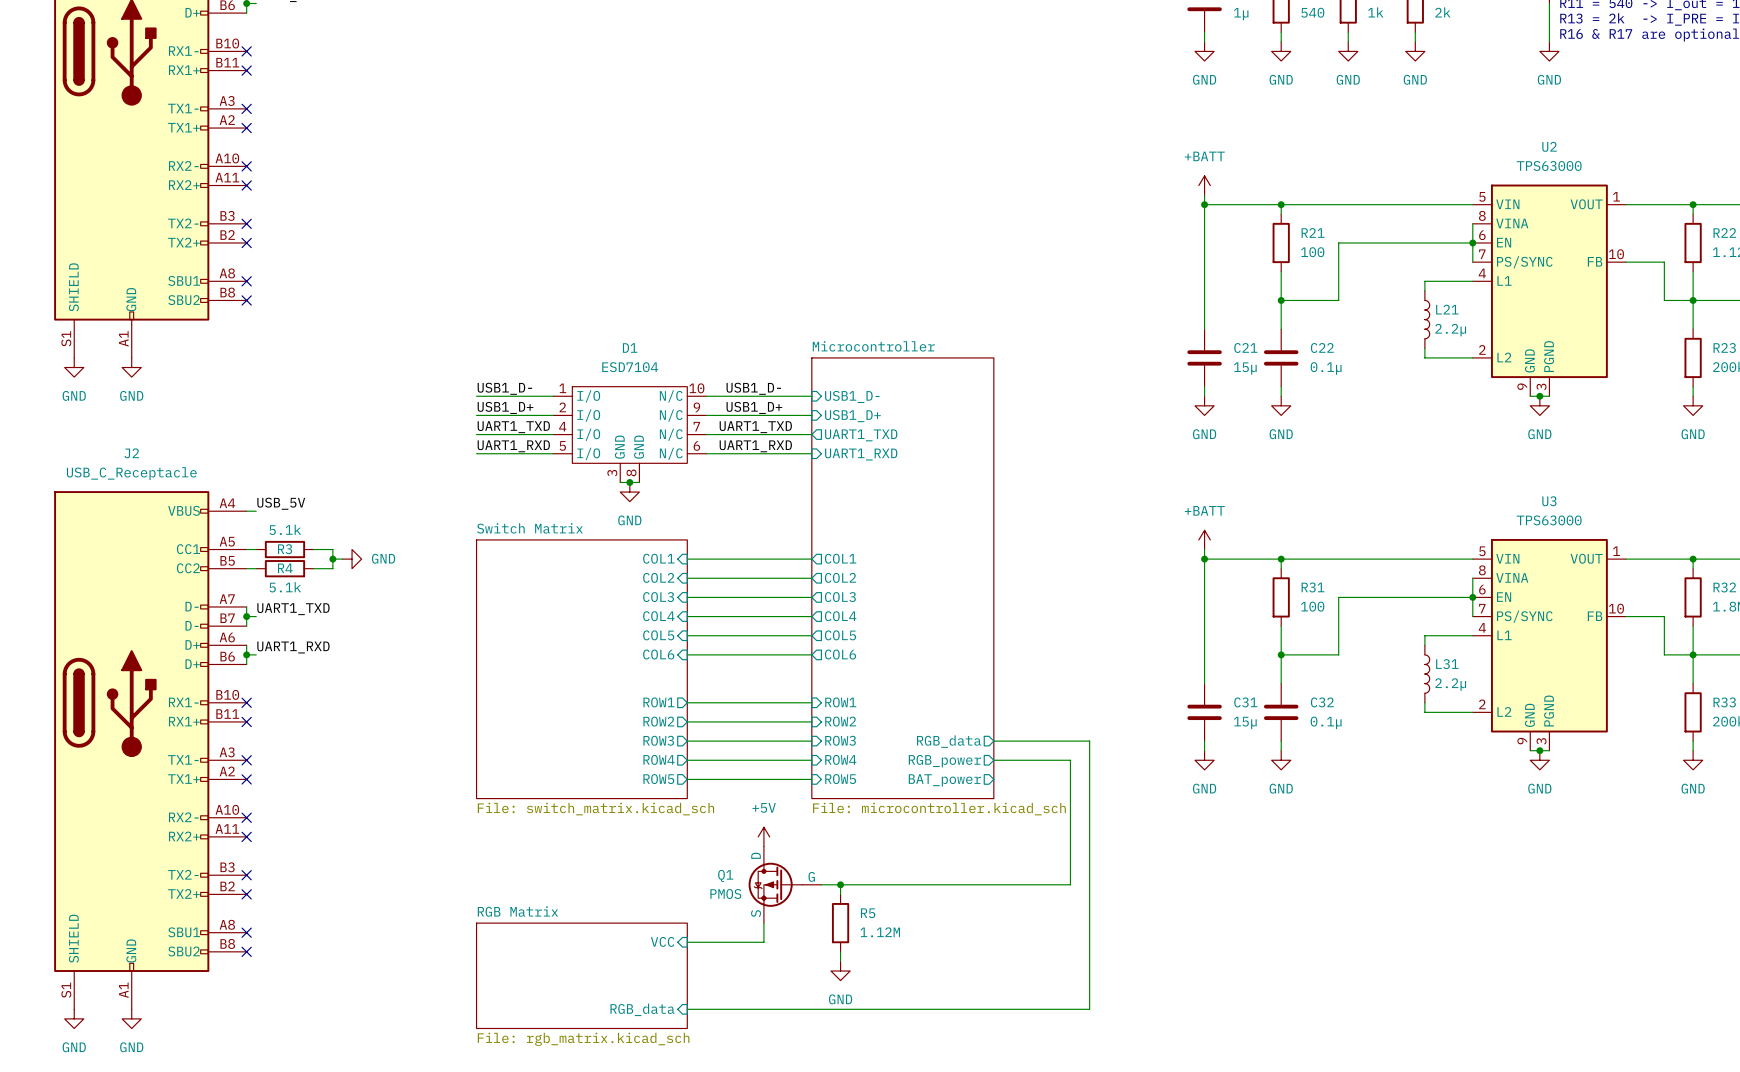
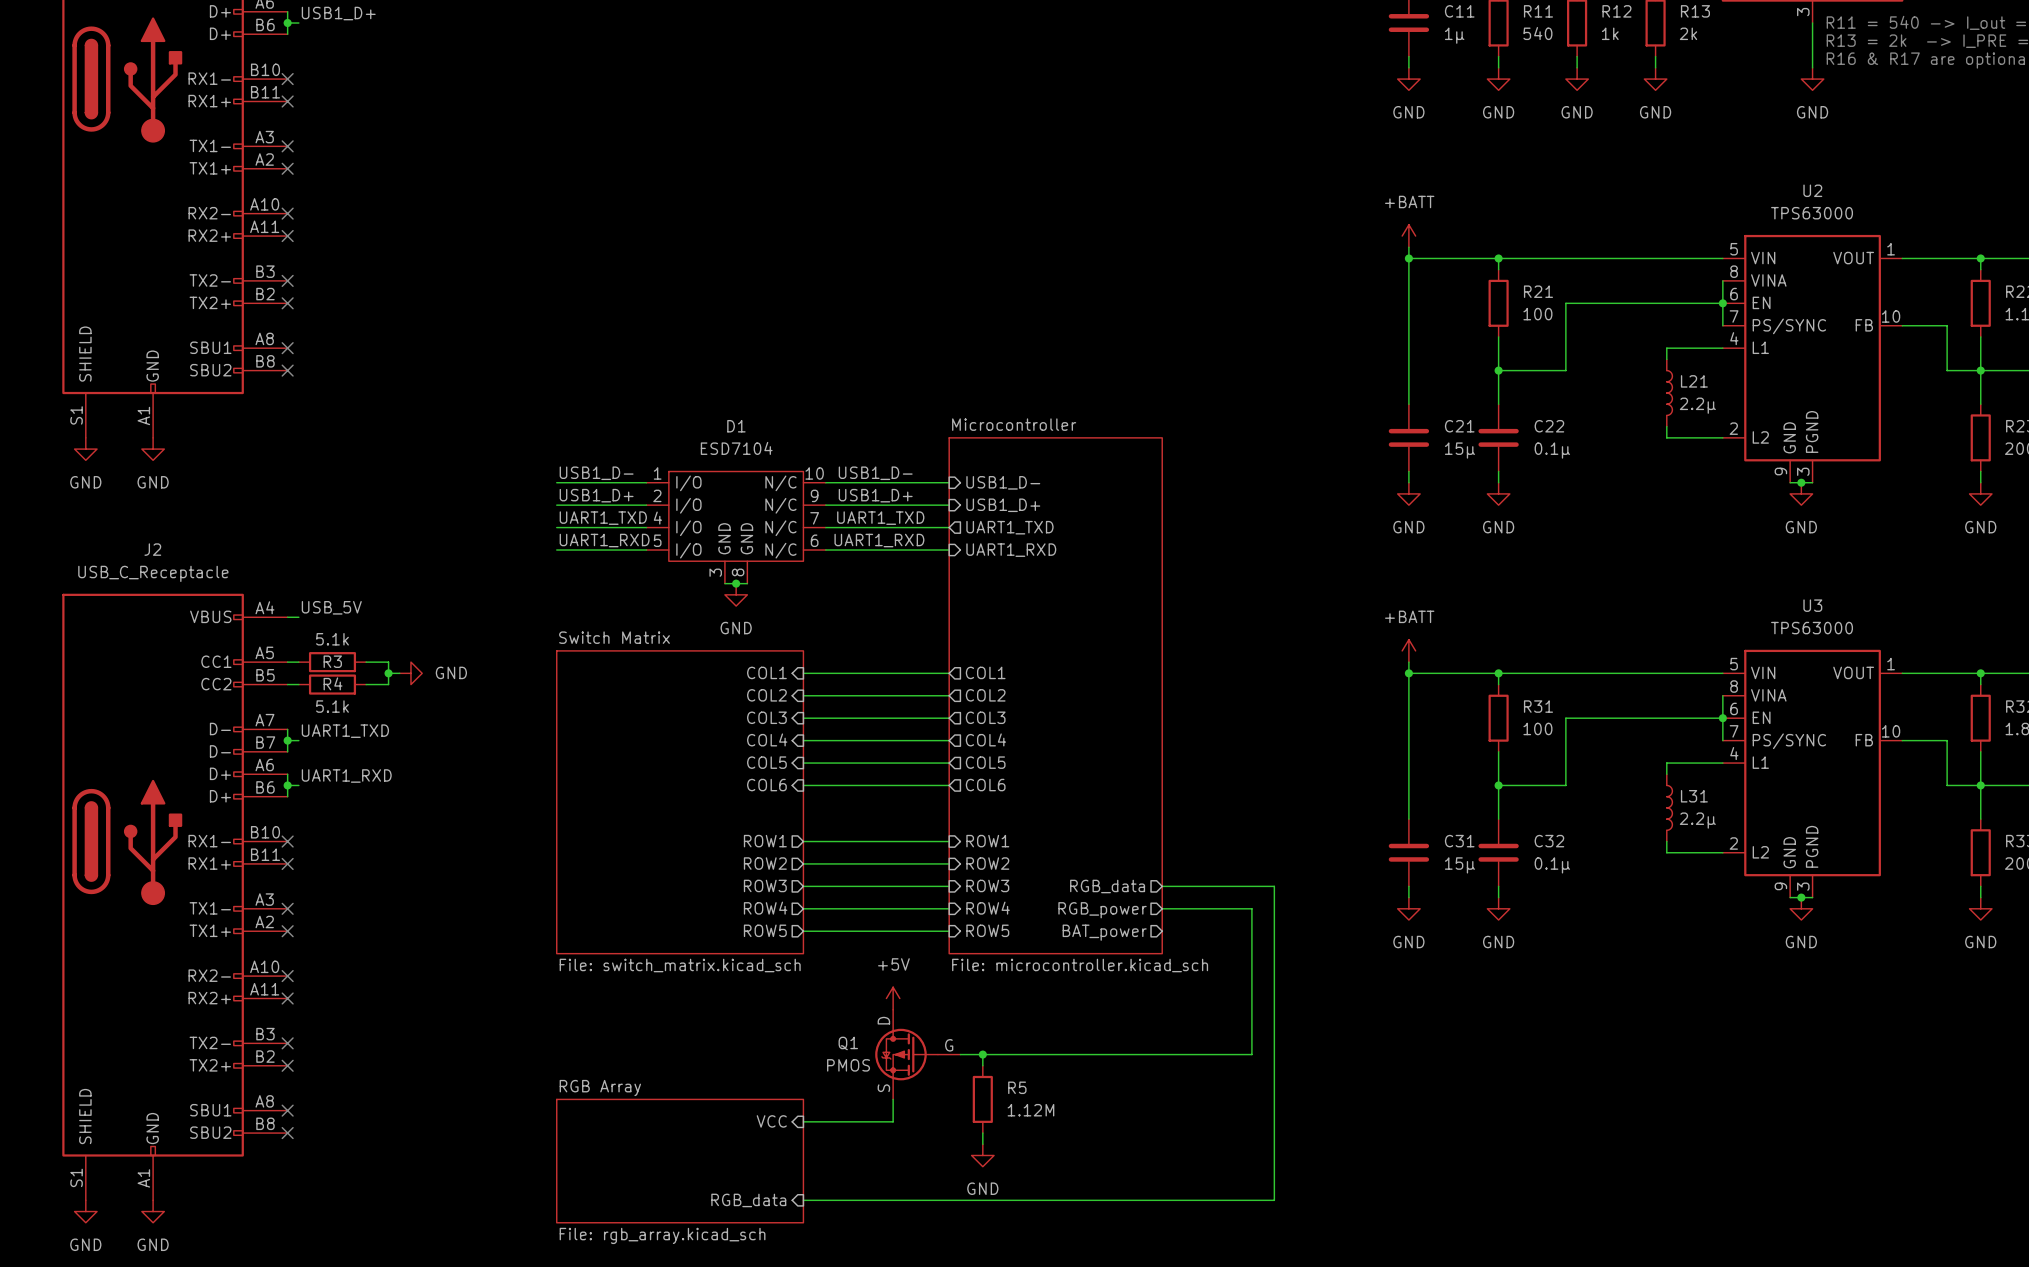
sheet RGB Matrix name: RGB Matrix (517, 911) -> RGB Array (600, 1088)
sheet RGB Matrix value: File: rgb_matrix.kicad_sch (583, 1039) -> File: rgb_array.kicad_sch (662, 1235)

